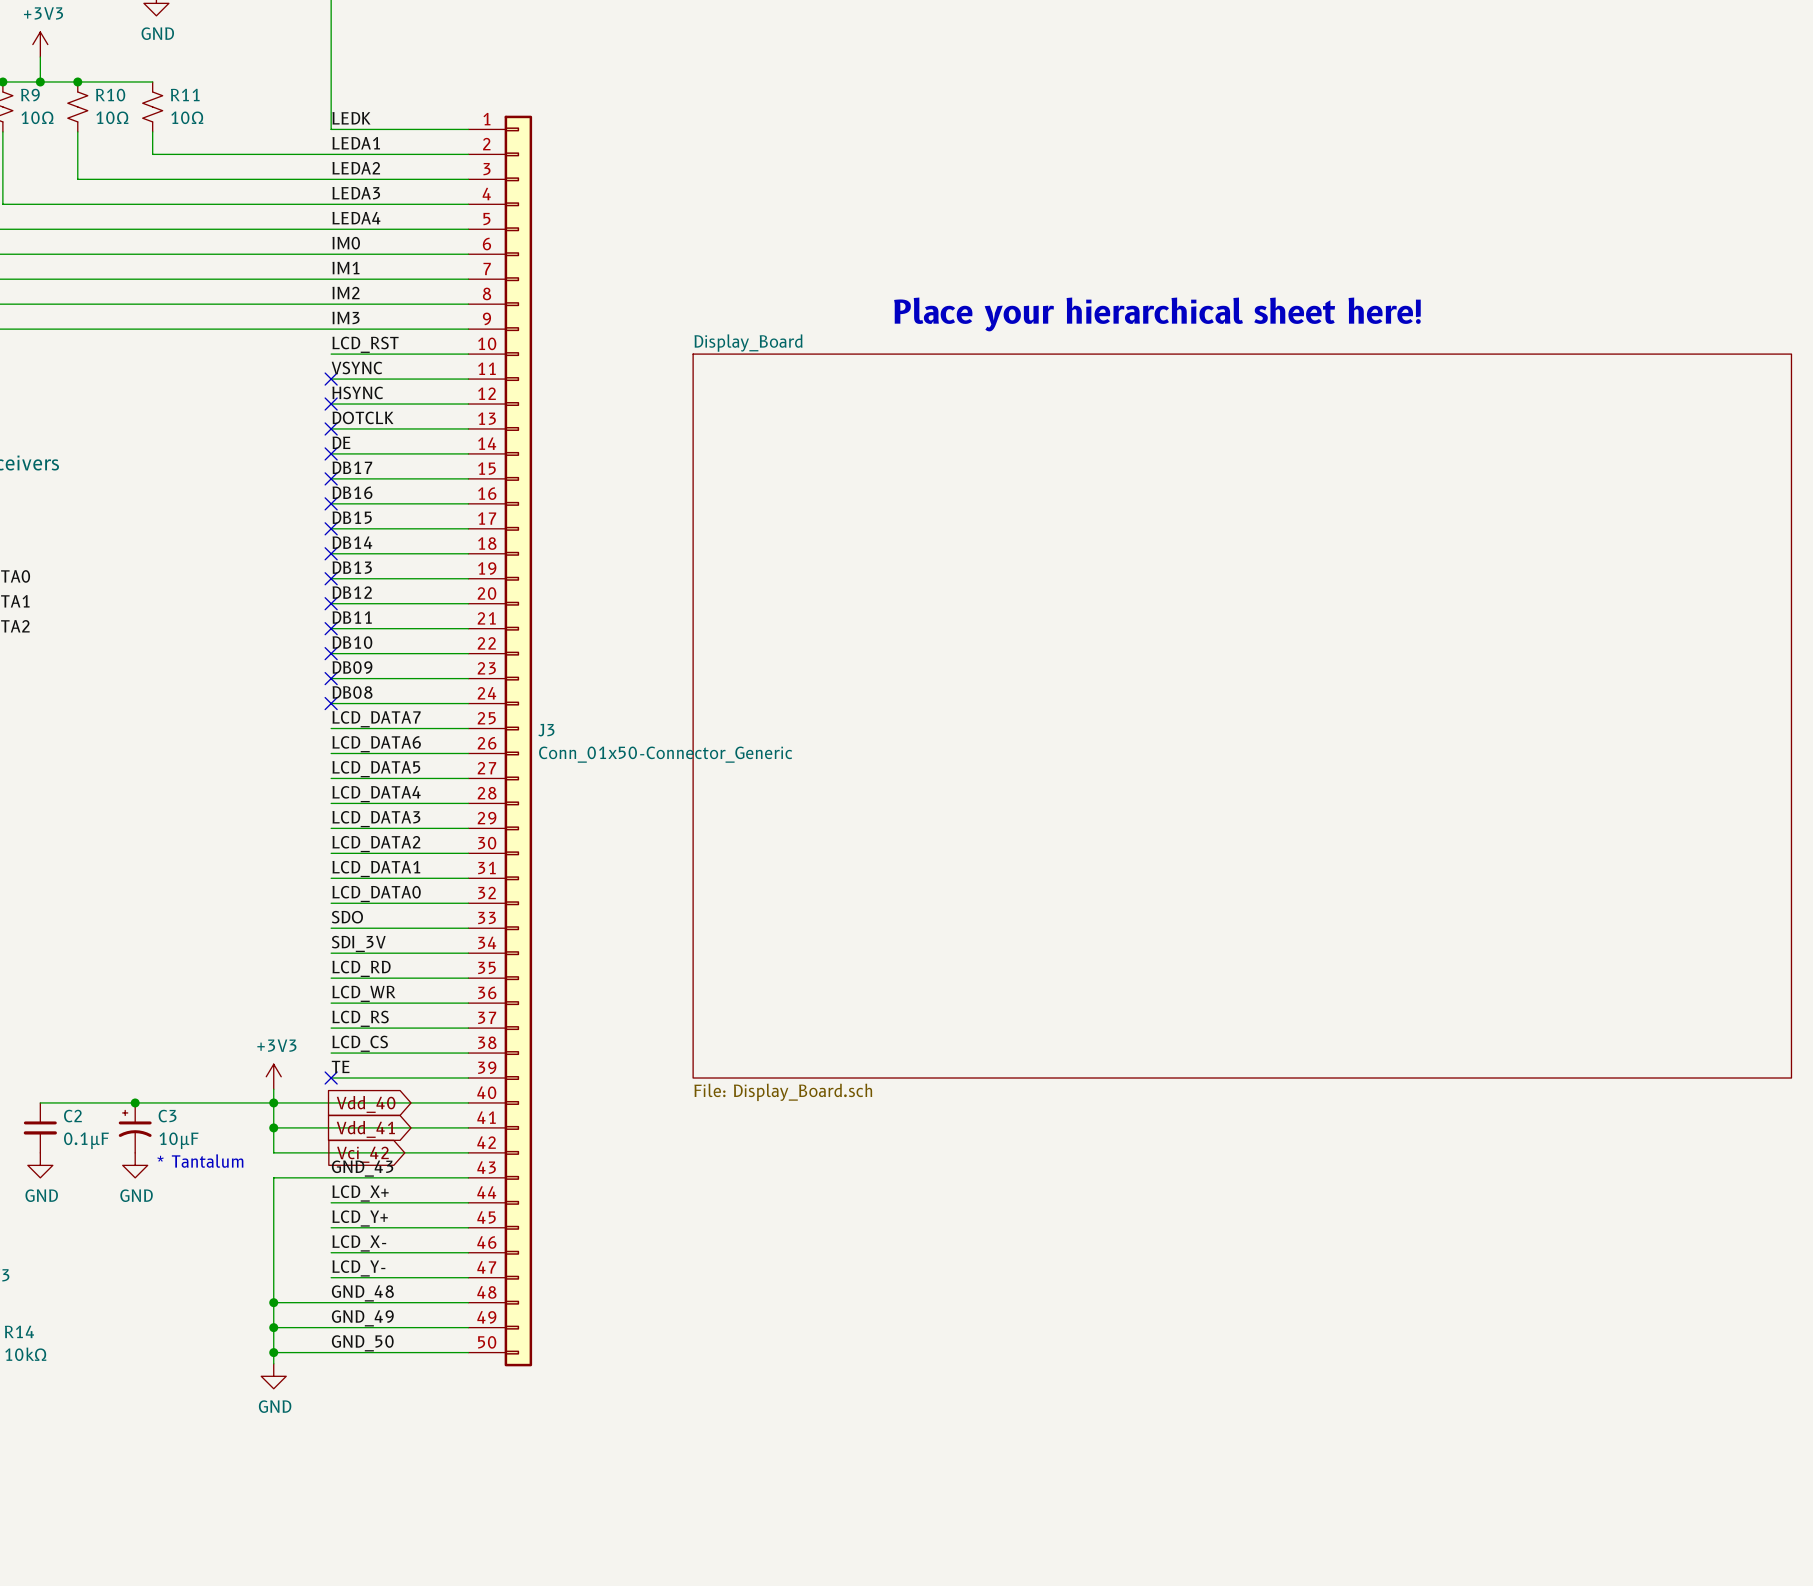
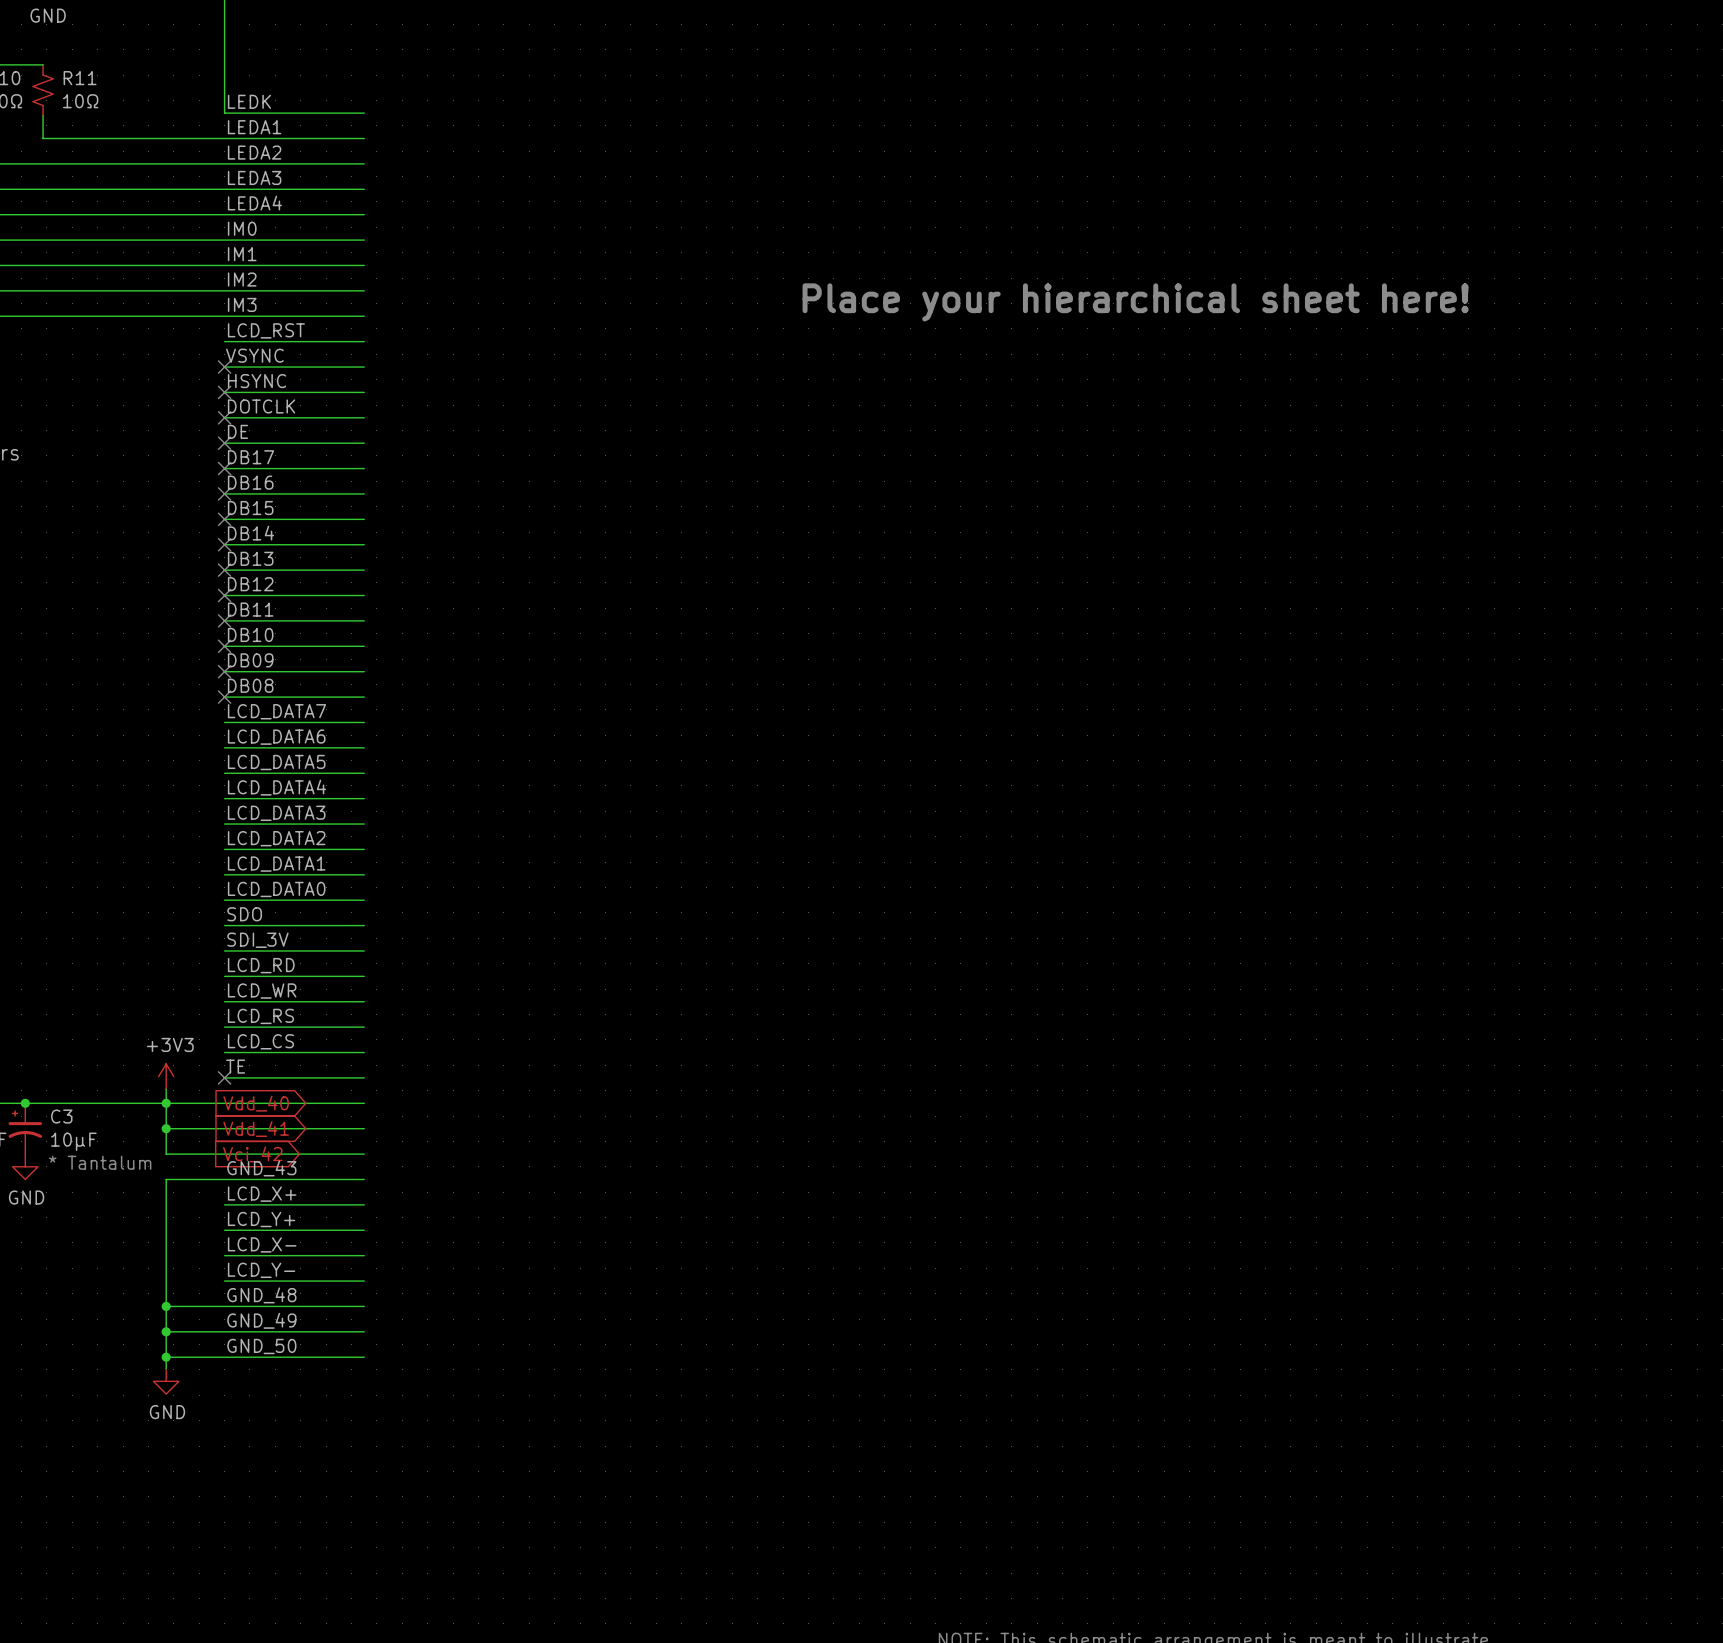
sheet Display_Board: File: Display_Board.sch (1242, 716) -> none
J3: Conn_01x50-Connector_Generic (500, 741) -> none

